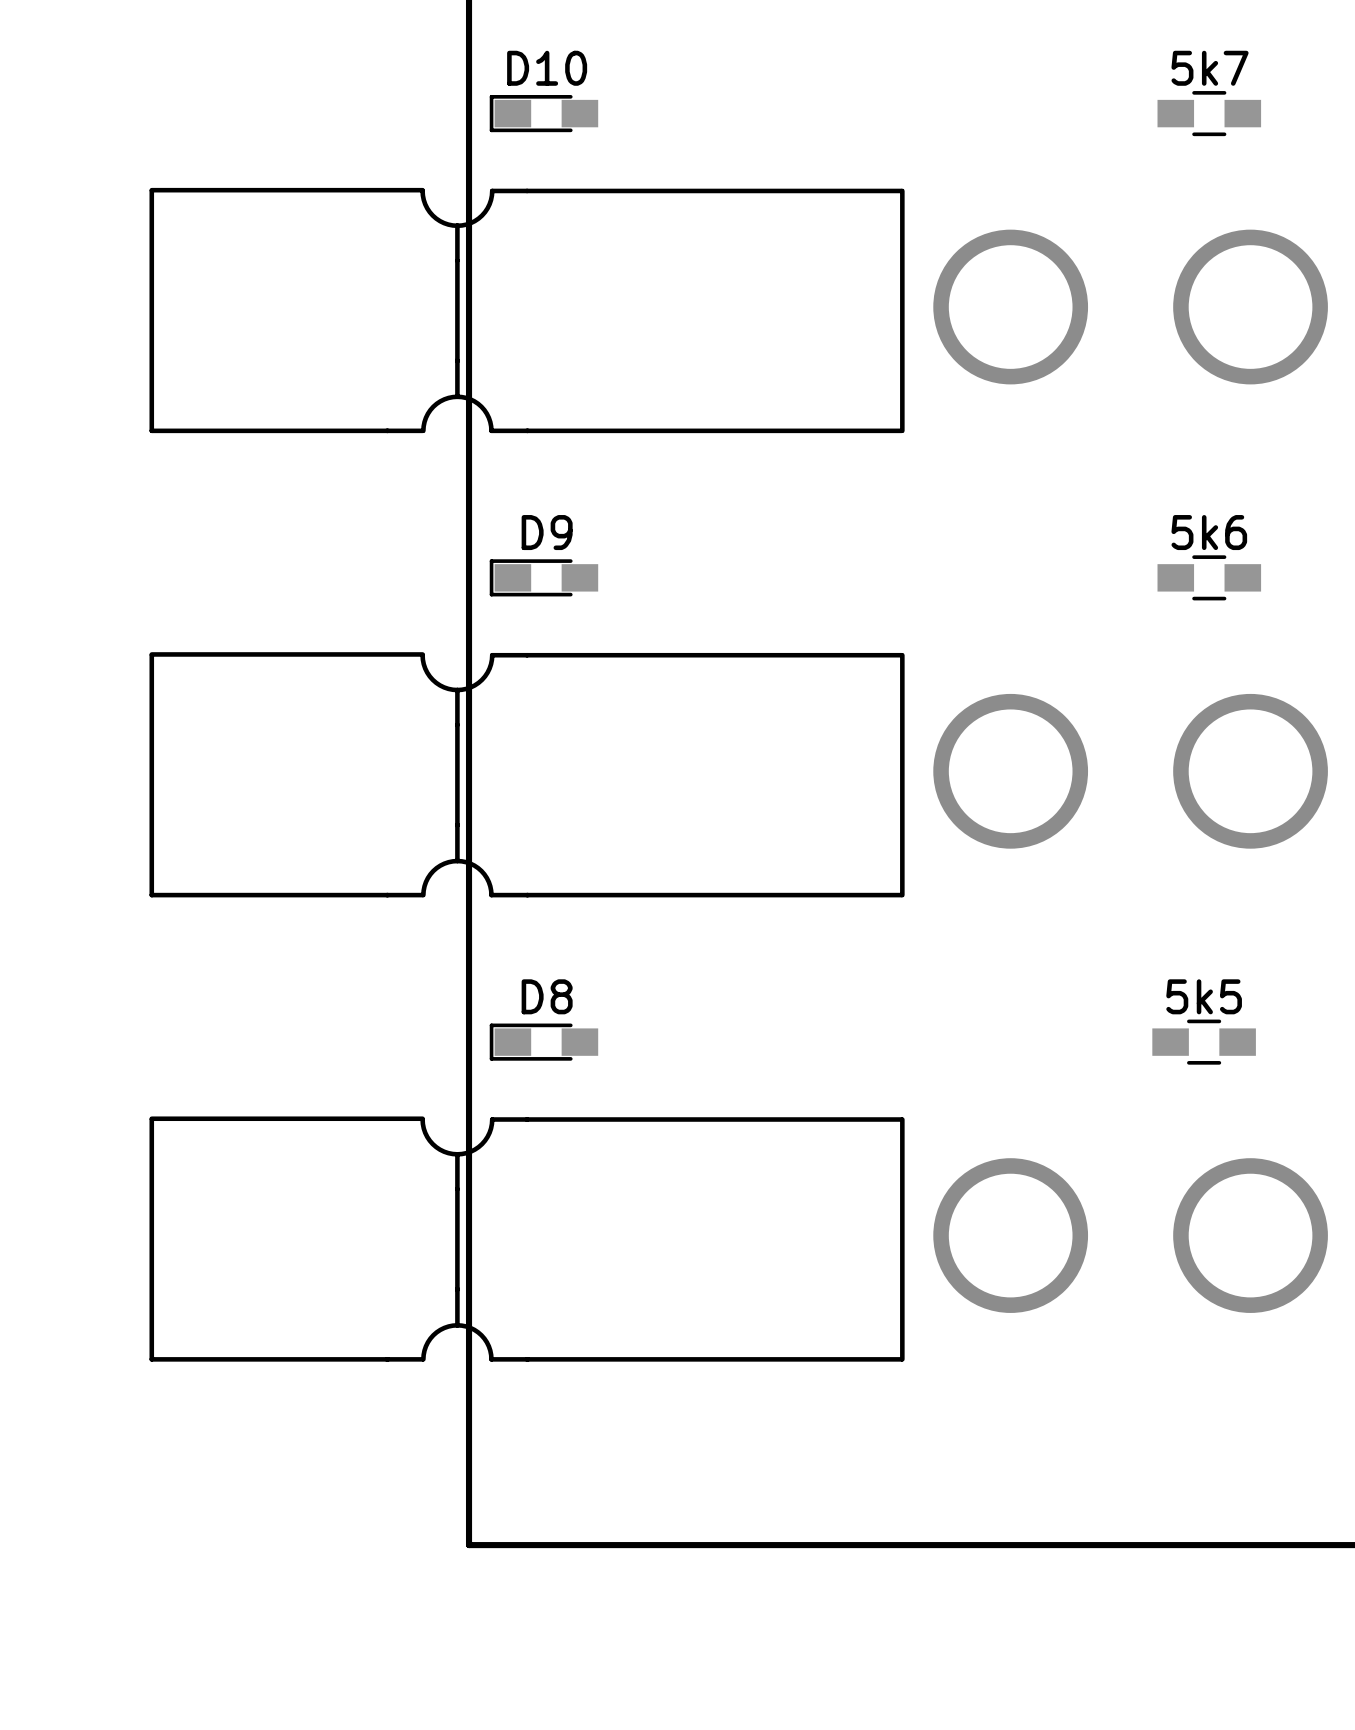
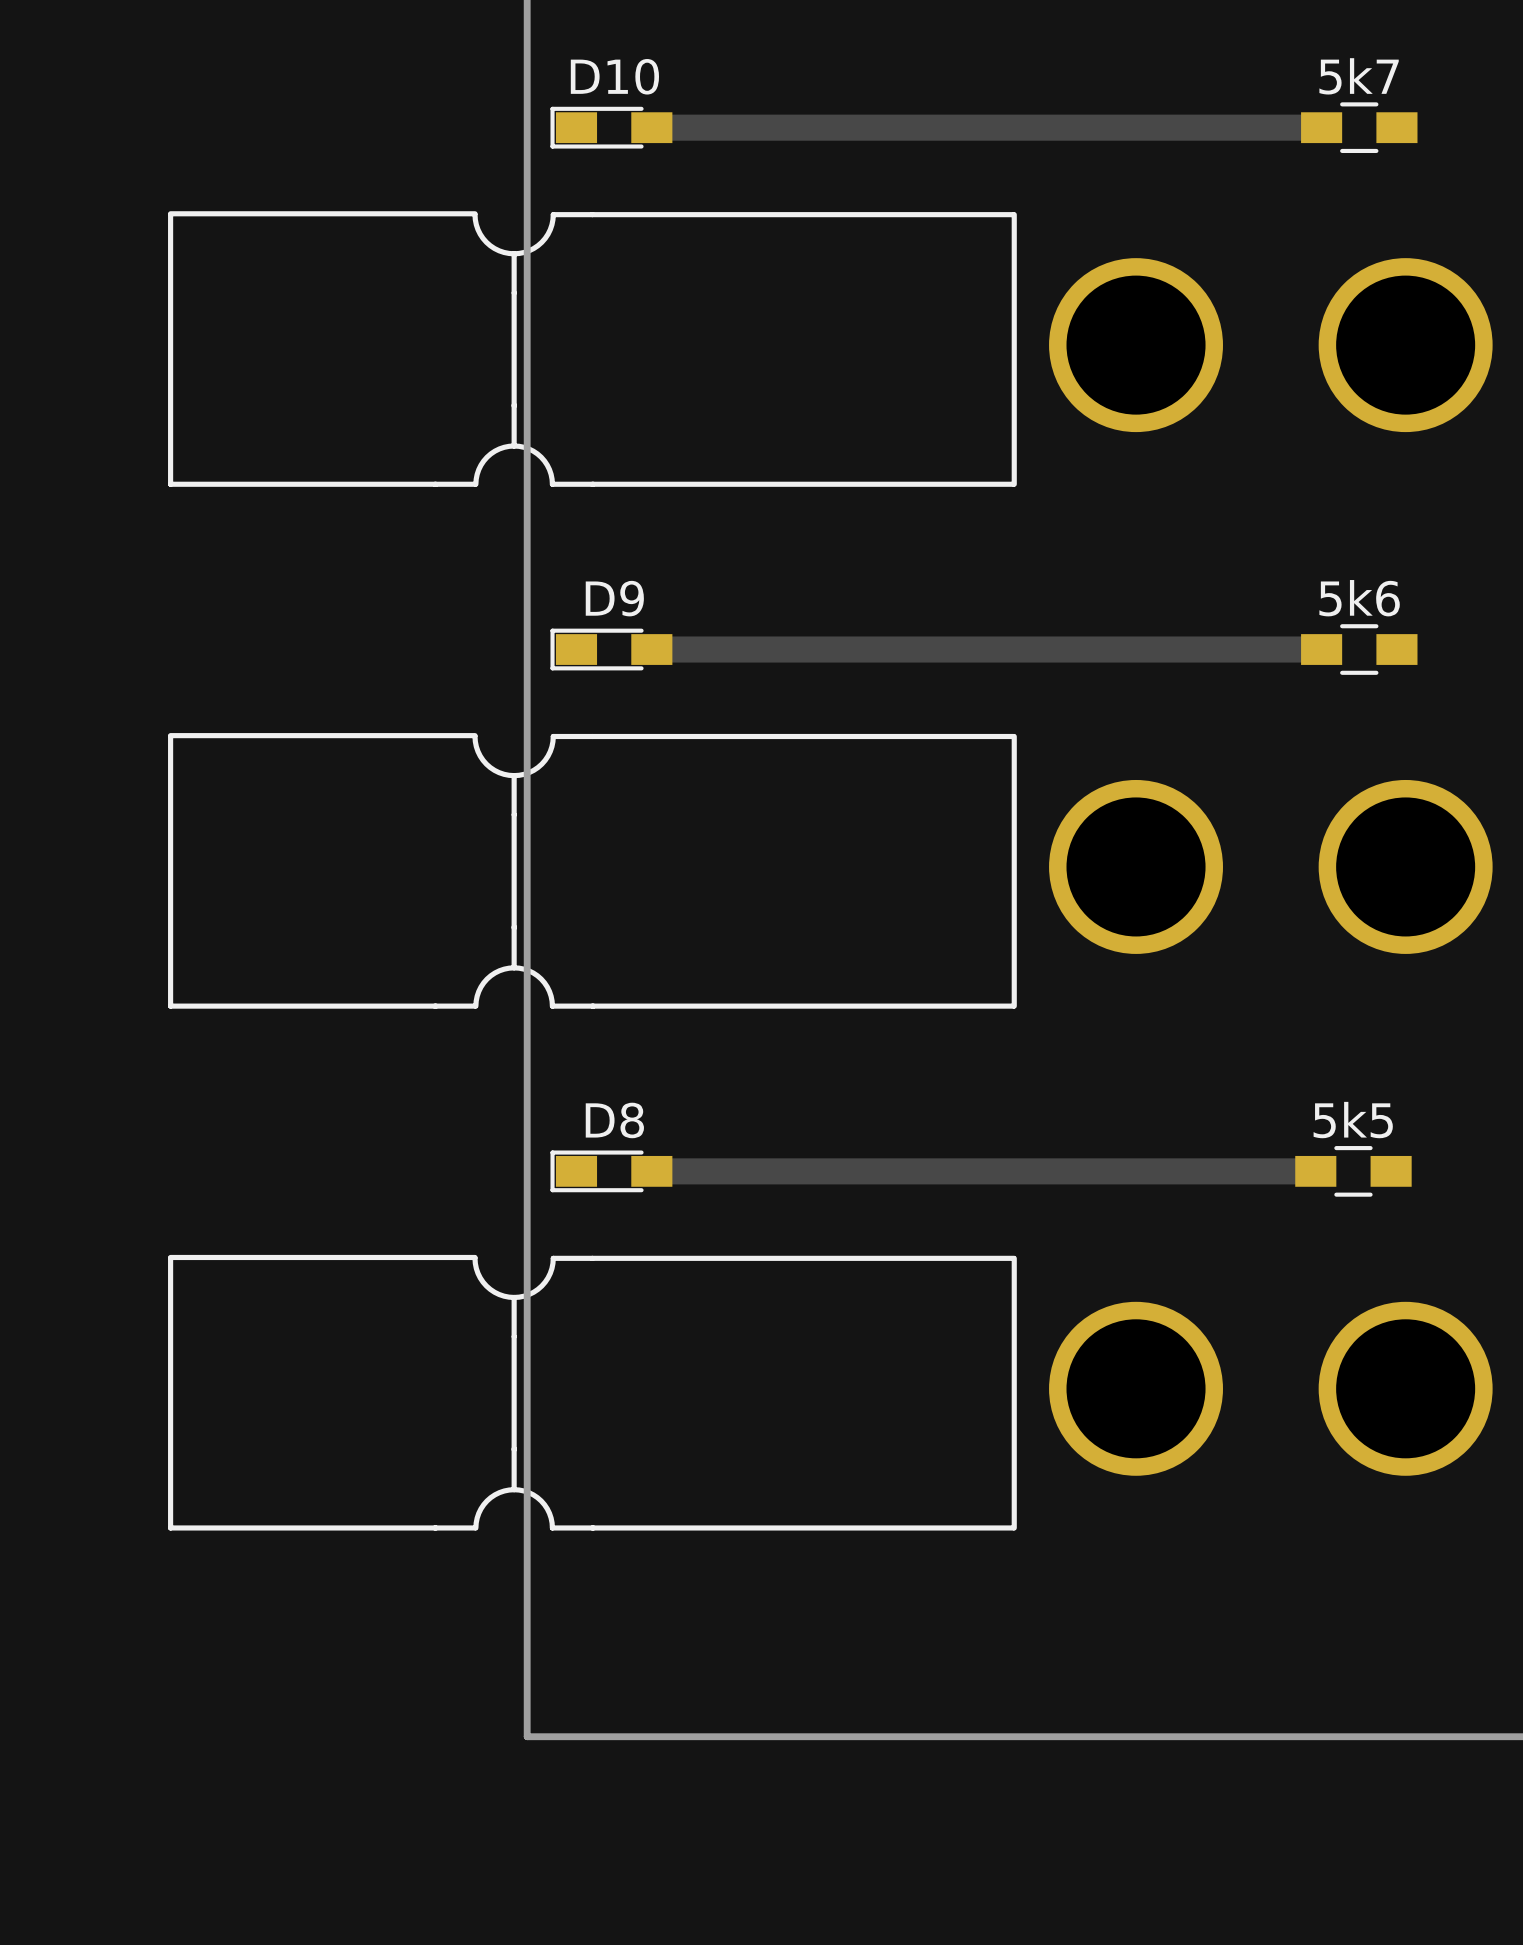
track: none -> (651, 127) (1321, 127)
track: none -> (651, 649) (1321, 649)
track: none -> (651, 1171) (1315, 1171)

